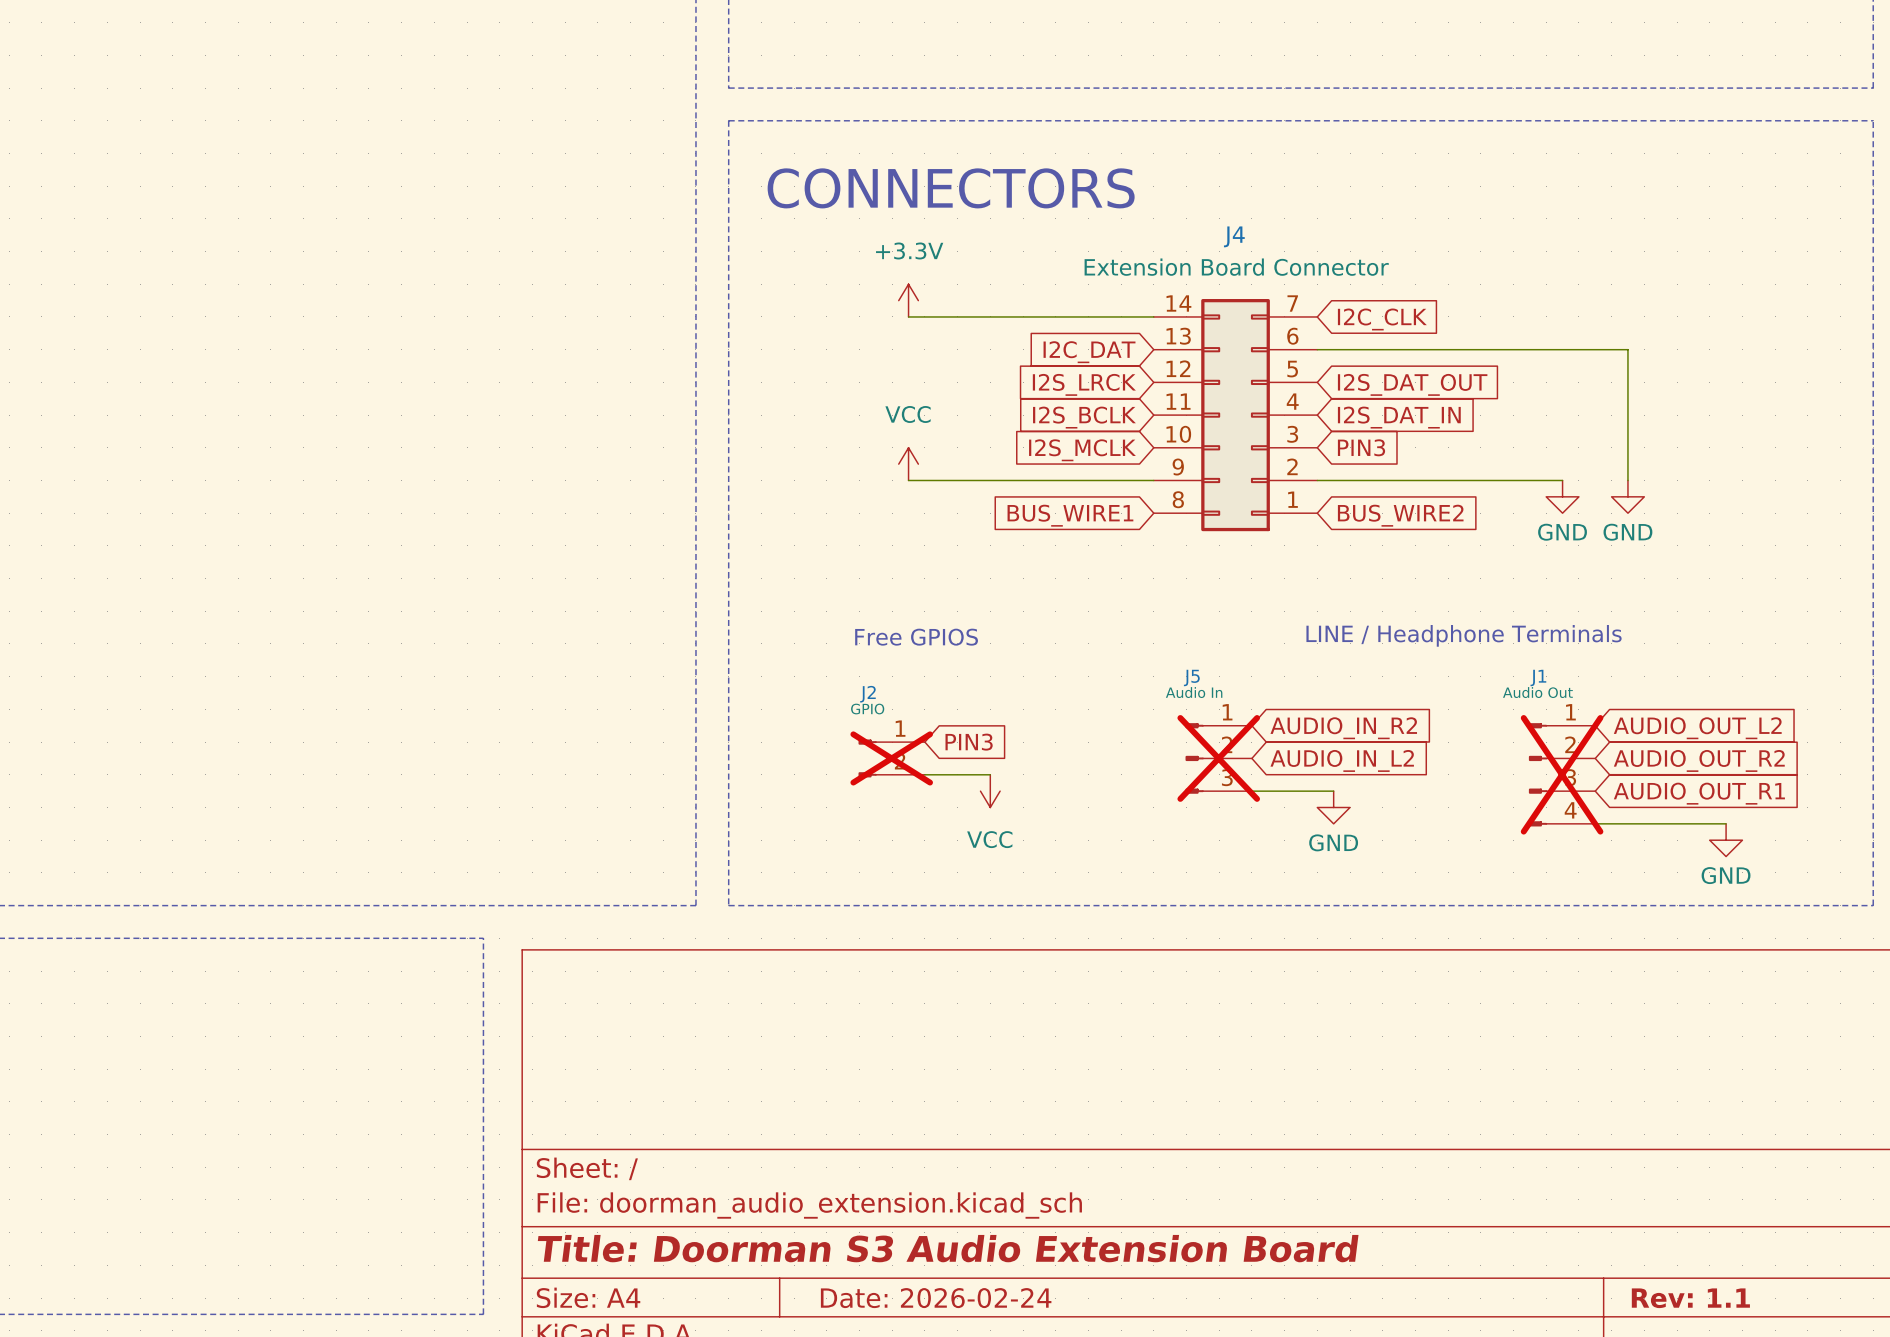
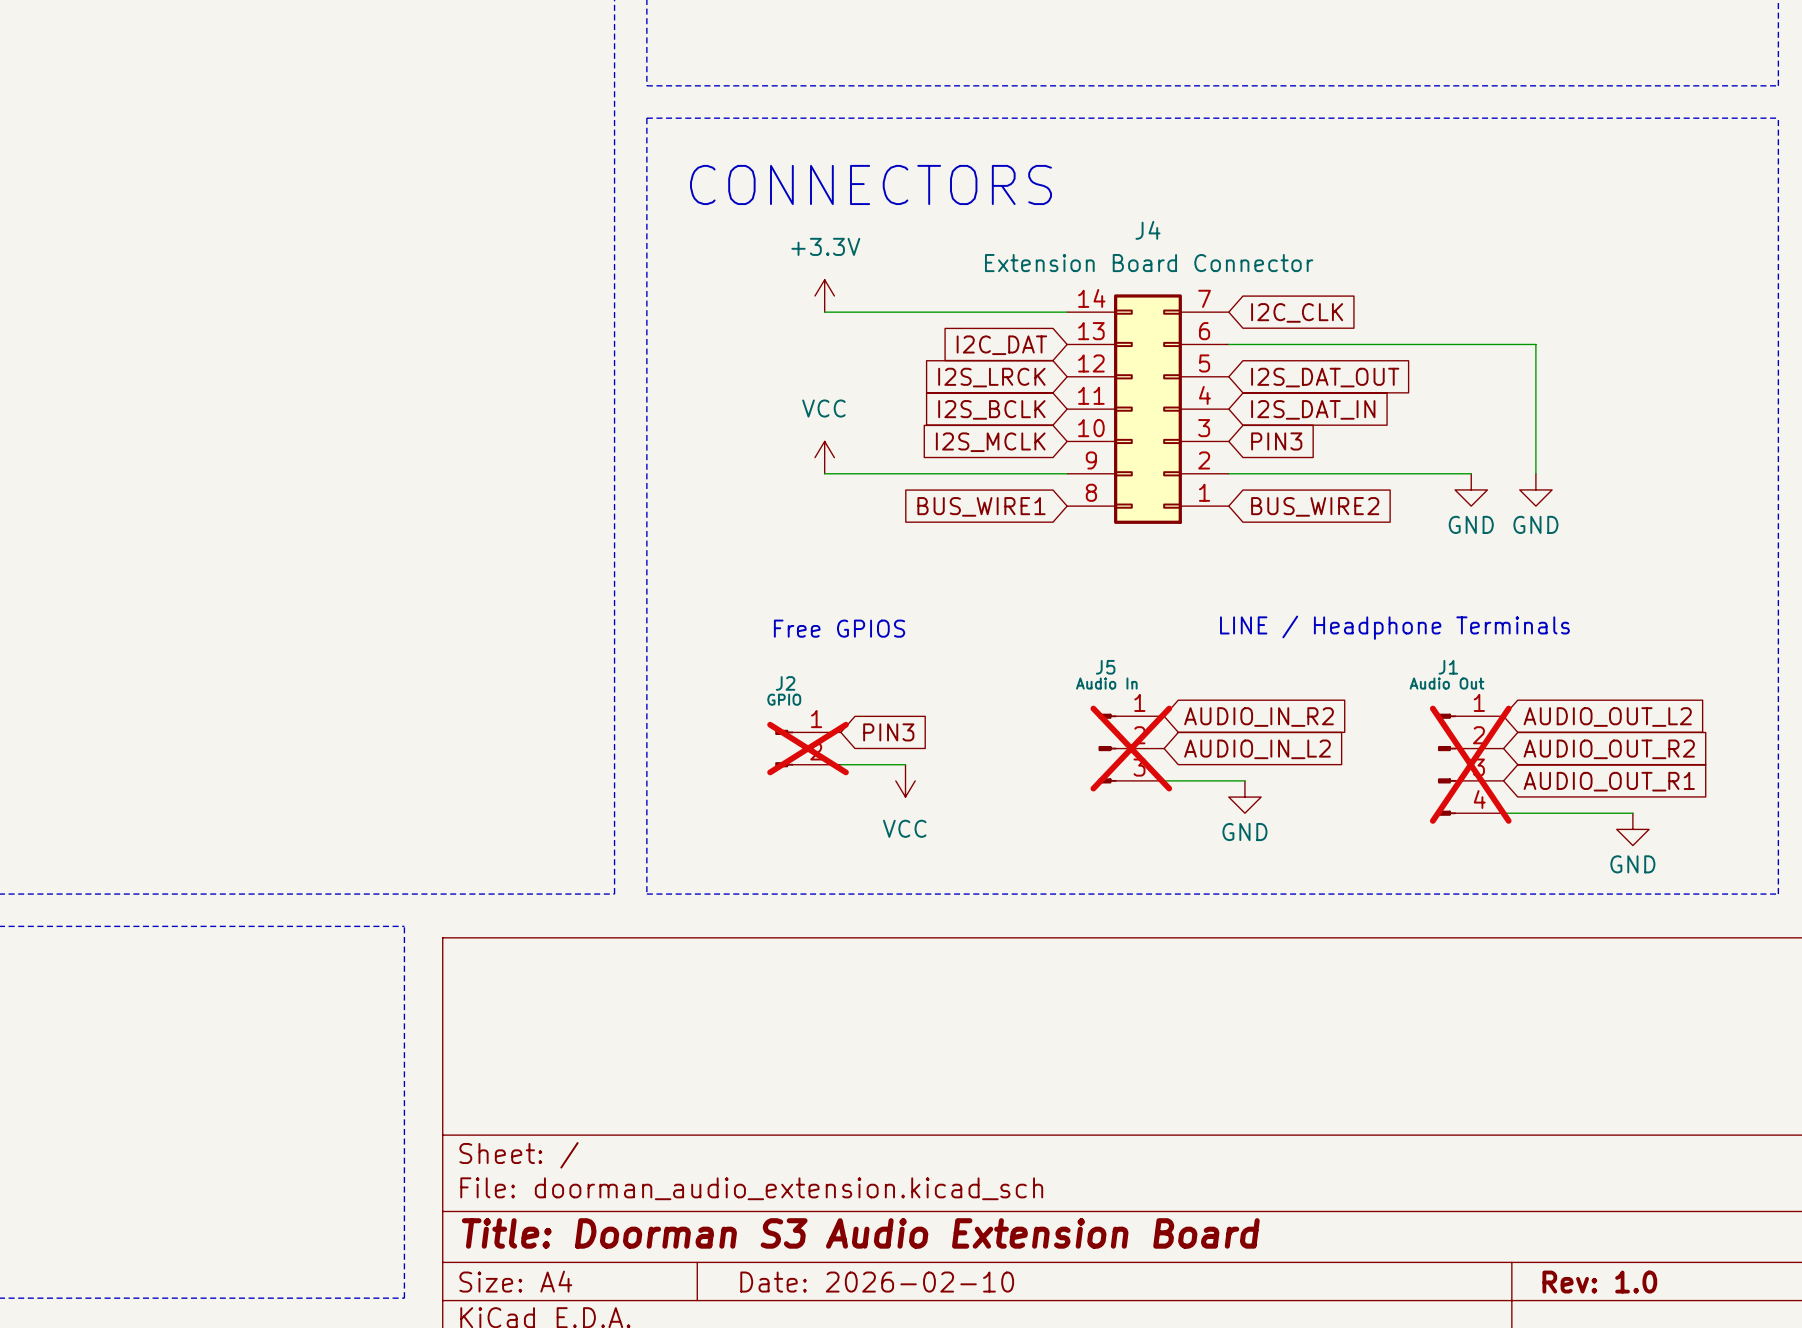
title block: Date: 2026-02-24 (936, 1298) -> Date: 2026-02-10 (877, 1282)
title block: Rev: 1.1 (1690, 1298) -> Rev: 1.0 (1599, 1282)

